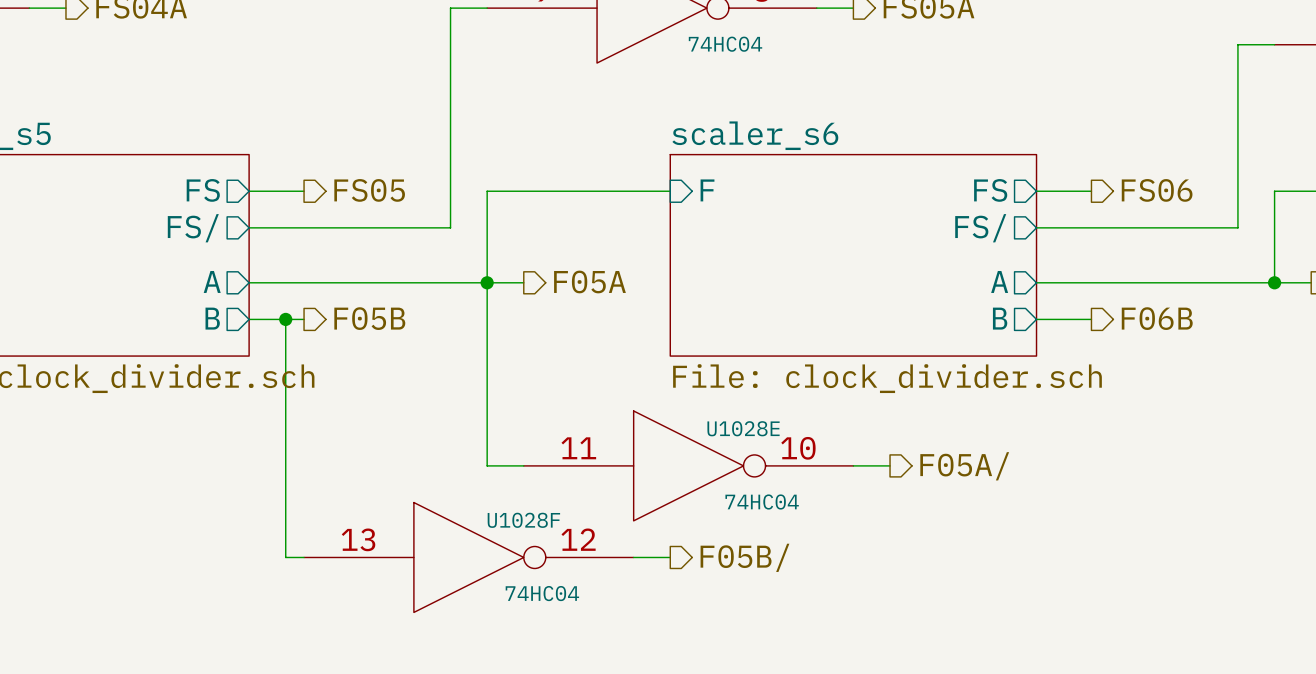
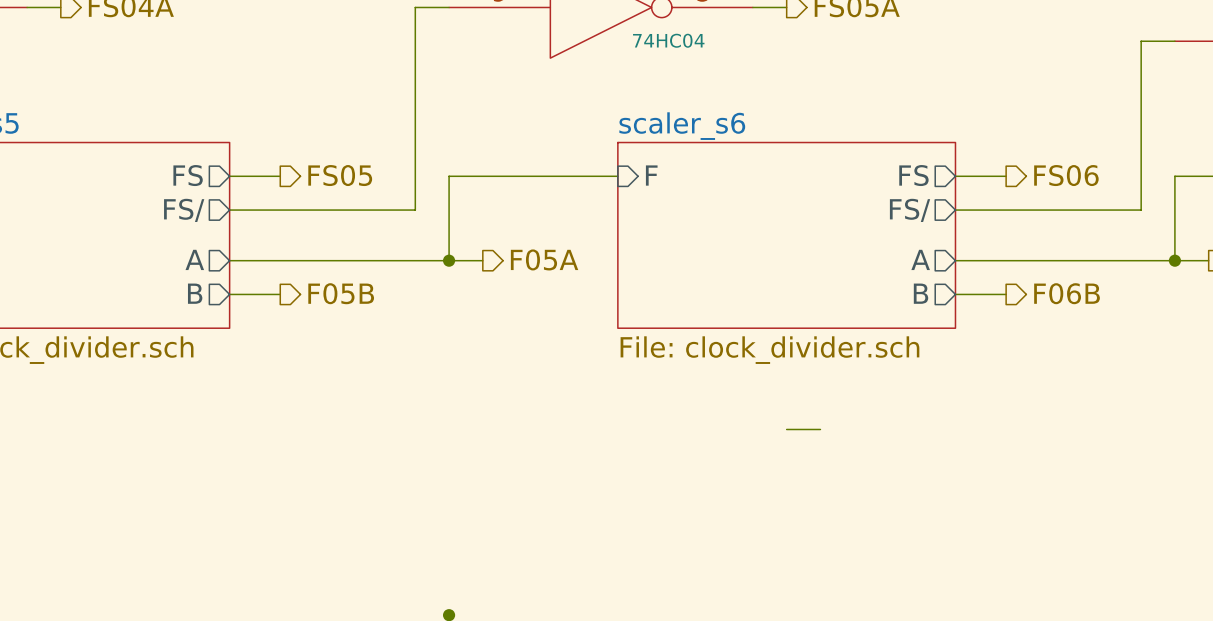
wire: (487, 282) (487, 465) (523, 465) -> none
wire: (285, 319) (285, 557) (304, 557) -> none
junction: (285, 319) -> none
U1028E: 74HC04 (688, 465) -> none
hierarchical label: F05A/ (964, 466) -> none
U1028F: 74HC04 (468, 557) -> none
wire: (633, 557) (670, 557) -> none
hierarchical label: F05B/ (744, 557) -> none
junction: none -> (449, 615)

